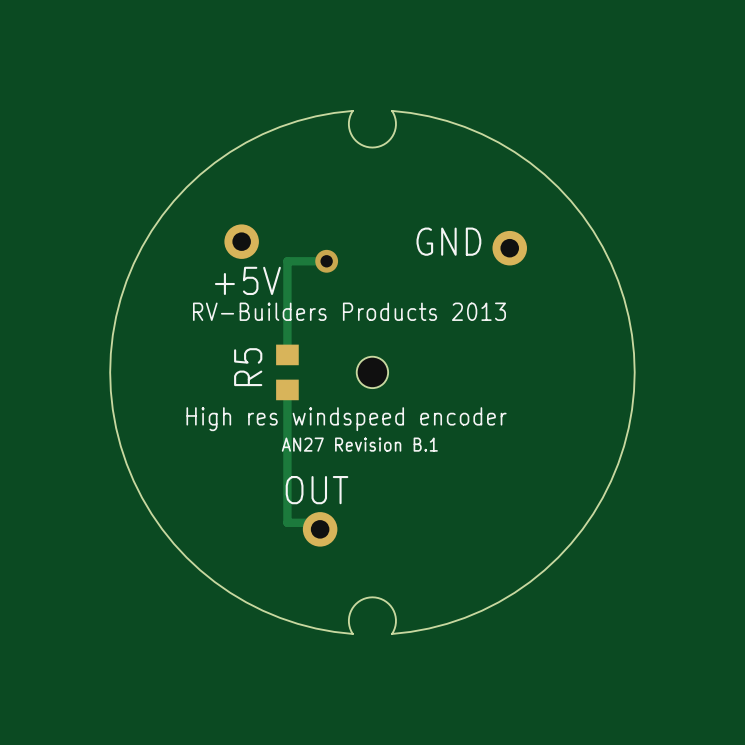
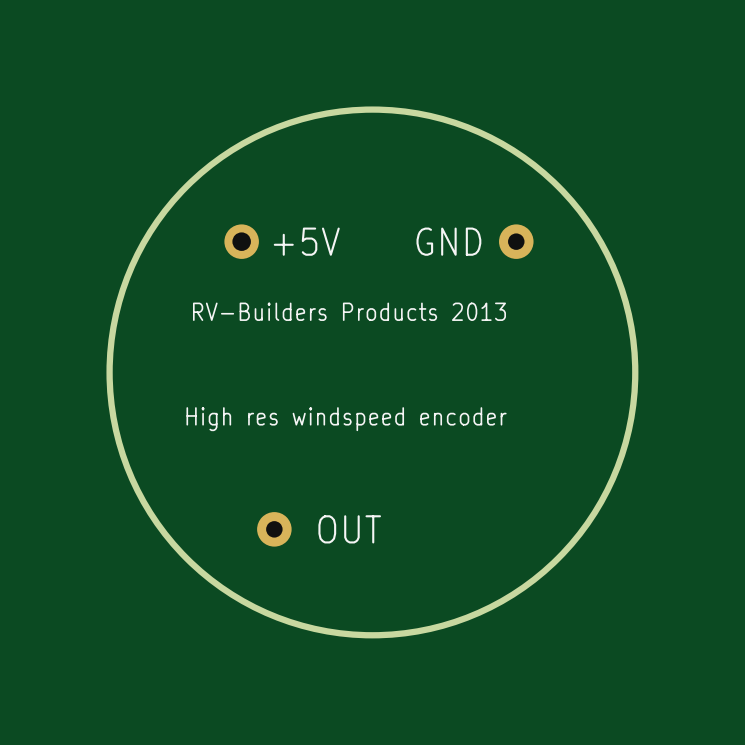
round board edge: none -> [106, 106, 639, 639]
board edge: (392, 110) (428, 116) (482, 134) (530, 162) (570, 201) (602, 247) (624, 298) (634, 353) (634, 391) (624, 446) (602, 497) (570, 543) (544, 570) (514, 592) (482, 610) (447, 623) (410, 631) (392, 633) (395, 619) (390, 606) (378, 598) (363, 599) (354, 606) (349, 613) (348, 622) (352, 633) (315, 628) (262, 610) (214, 582) (173, 543) (142, 497) (120, 446) (110, 391) (110, 353) (120, 298) (142, 247) (173, 201) (200, 174) (230, 152) (262, 134) (297, 121) (334, 112) (352, 110) (348, 125) (354, 138) (366, 146) (381, 145) (390, 138) (394, 130) (395, 122) (392, 110) -> none
part footprint: [492, 230, 528, 266] -> [499, 224, 534, 259]
track: (326, 261) (287, 261) (287, 354) -> none
via: (326, 261) -> none
text position: +5V (247, 280) -> +5V (306, 241)
R5: (287, 372) -> none
hole: (372, 372) -> none
track: (287, 389) (287, 522) (320, 522) (320, 529) -> none
text: AN27 Revision B.1 (359, 444) -> none
text position: OUT (317, 490) -> OUT (349, 529)
part: none -> (274, 529)
part: (320, 529) -> none

